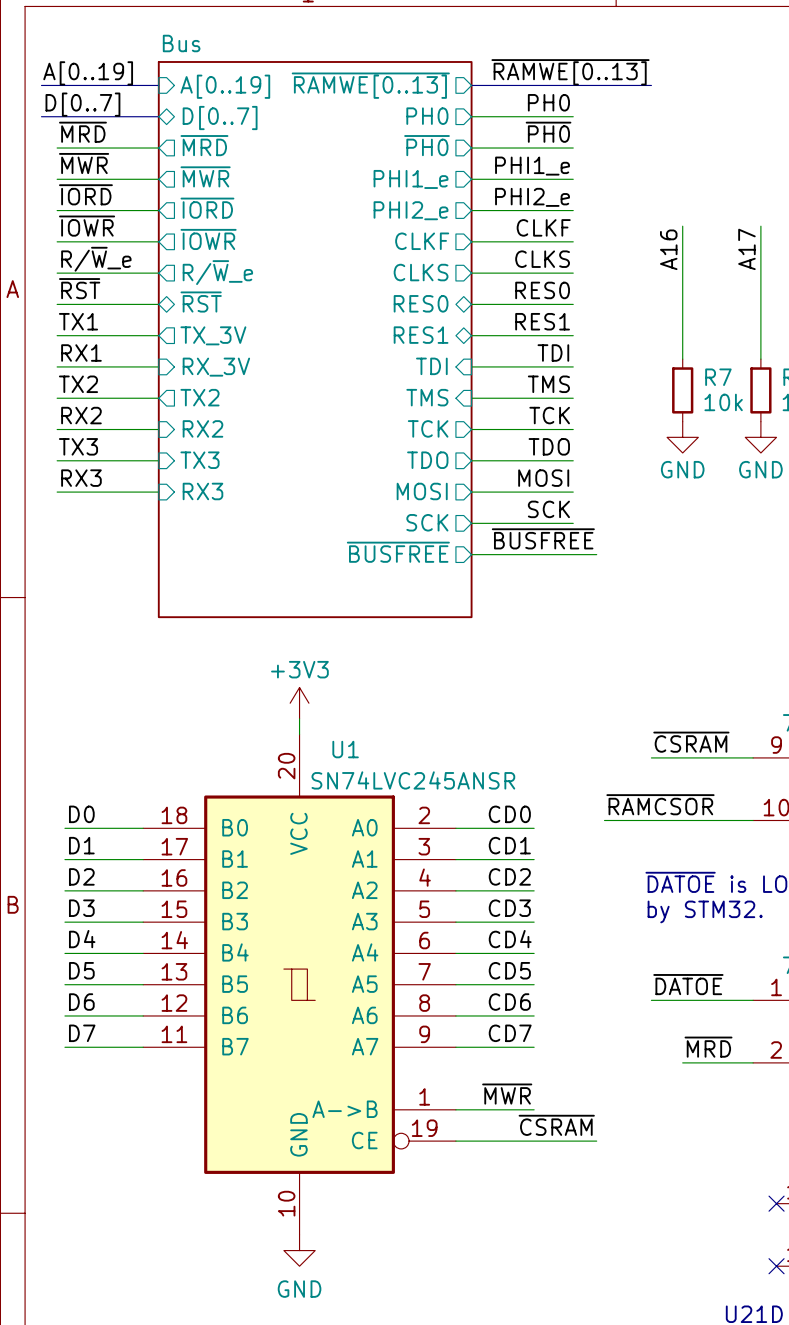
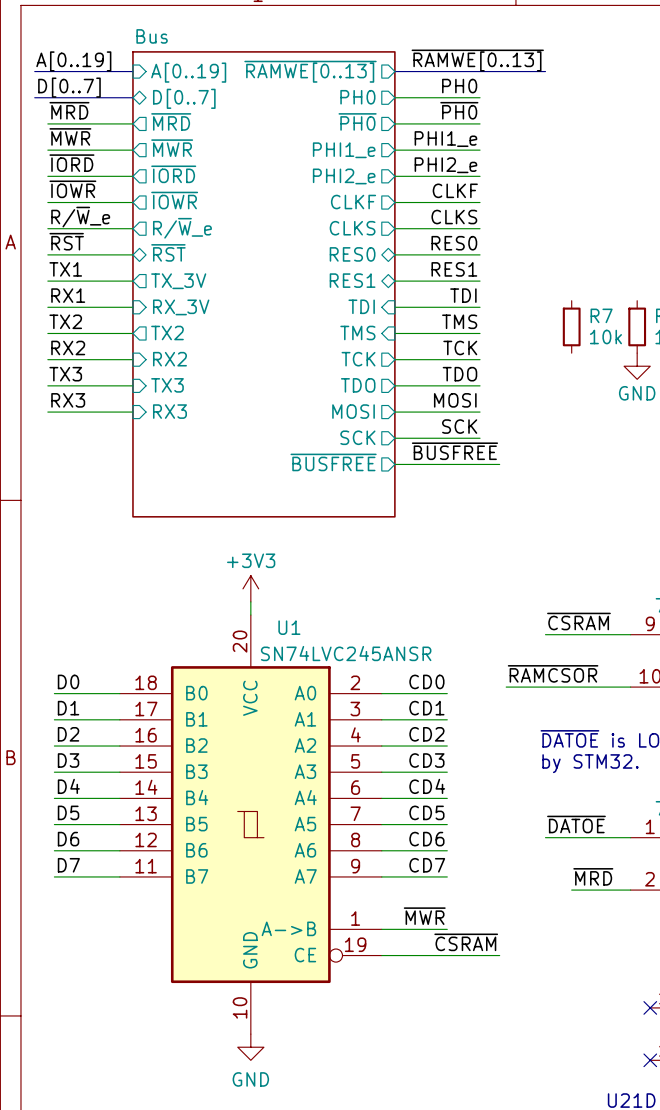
wire: (682, 226) (682, 359) -> none
wire: (760, 226) (760, 359) -> none
label: A16 (668, 249) -> none
label: A17 (746, 249) -> none
power symbol: GND (682, 437) -> none

